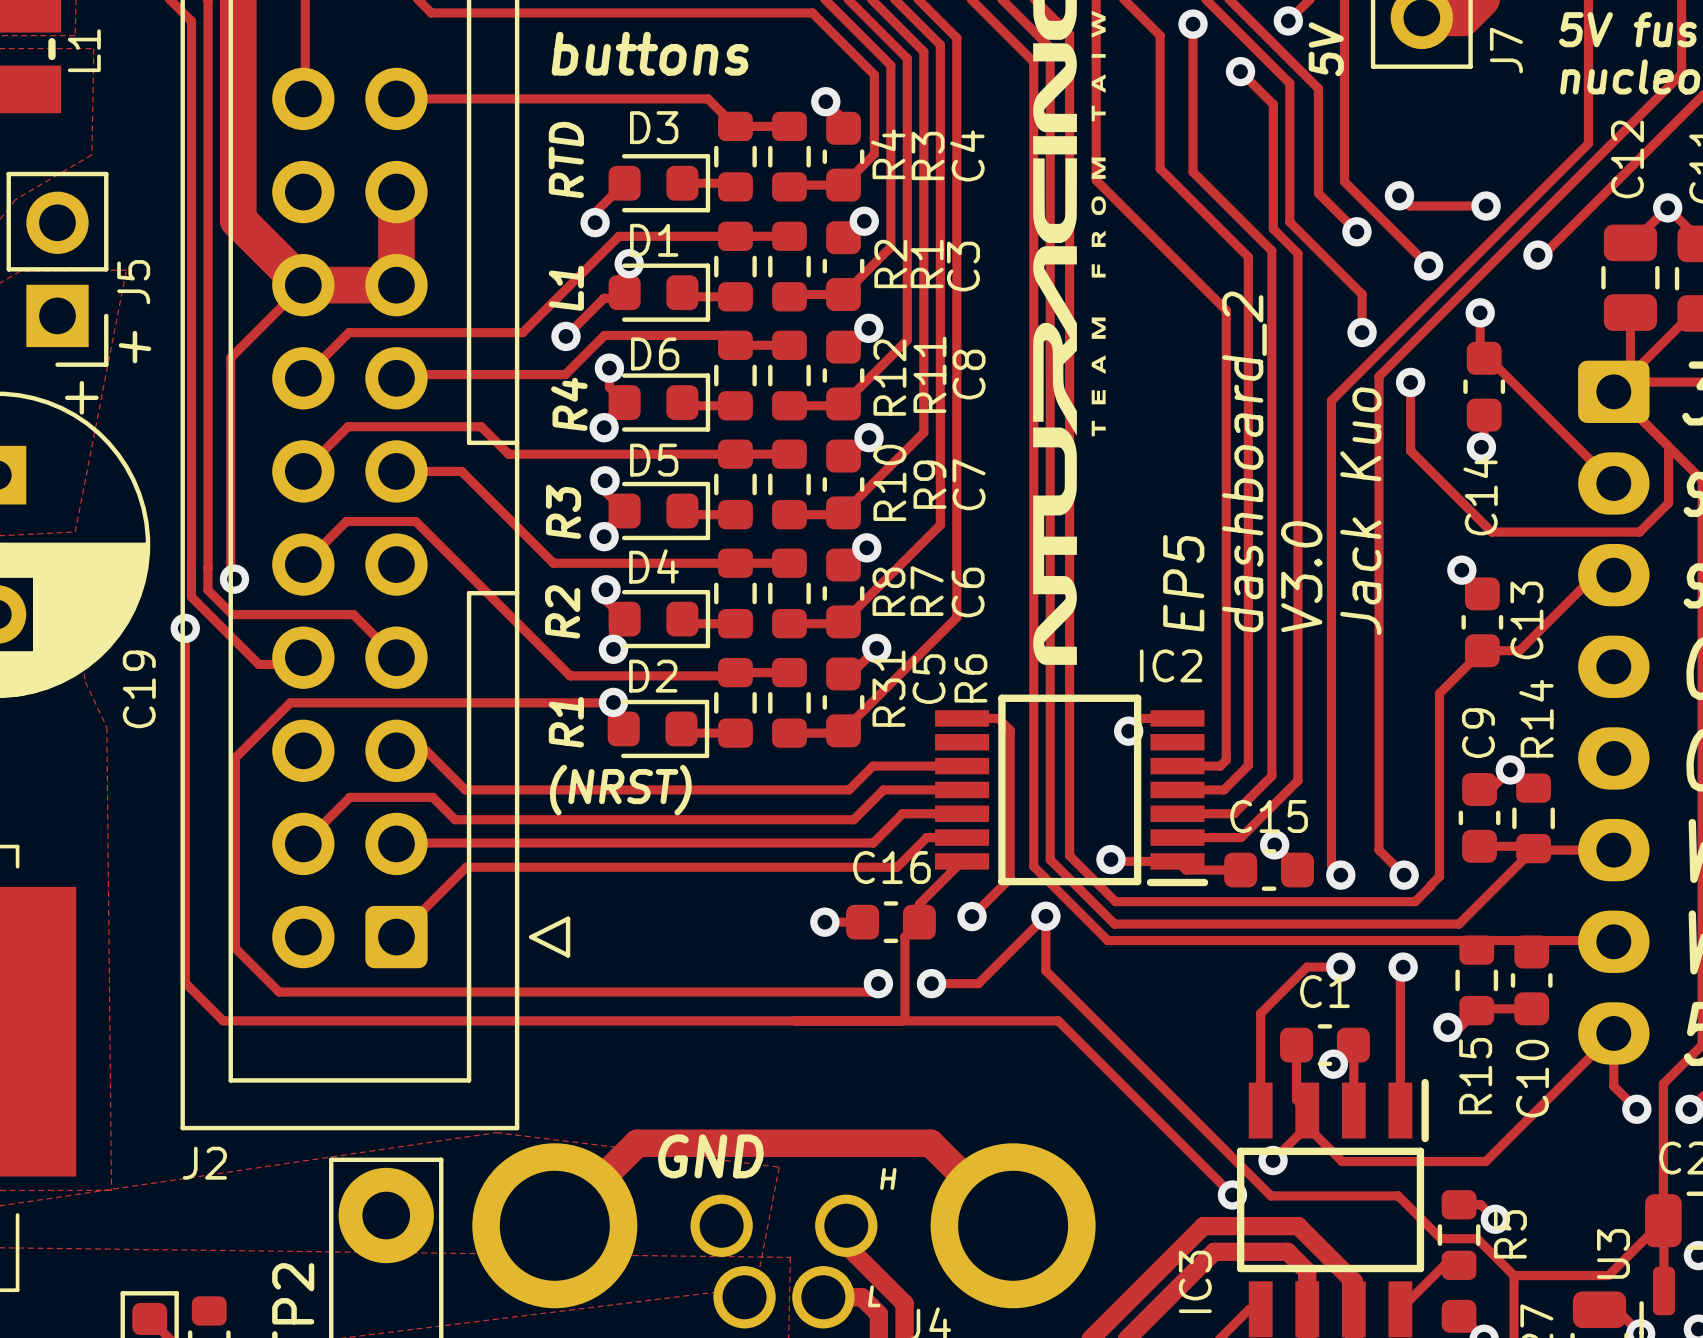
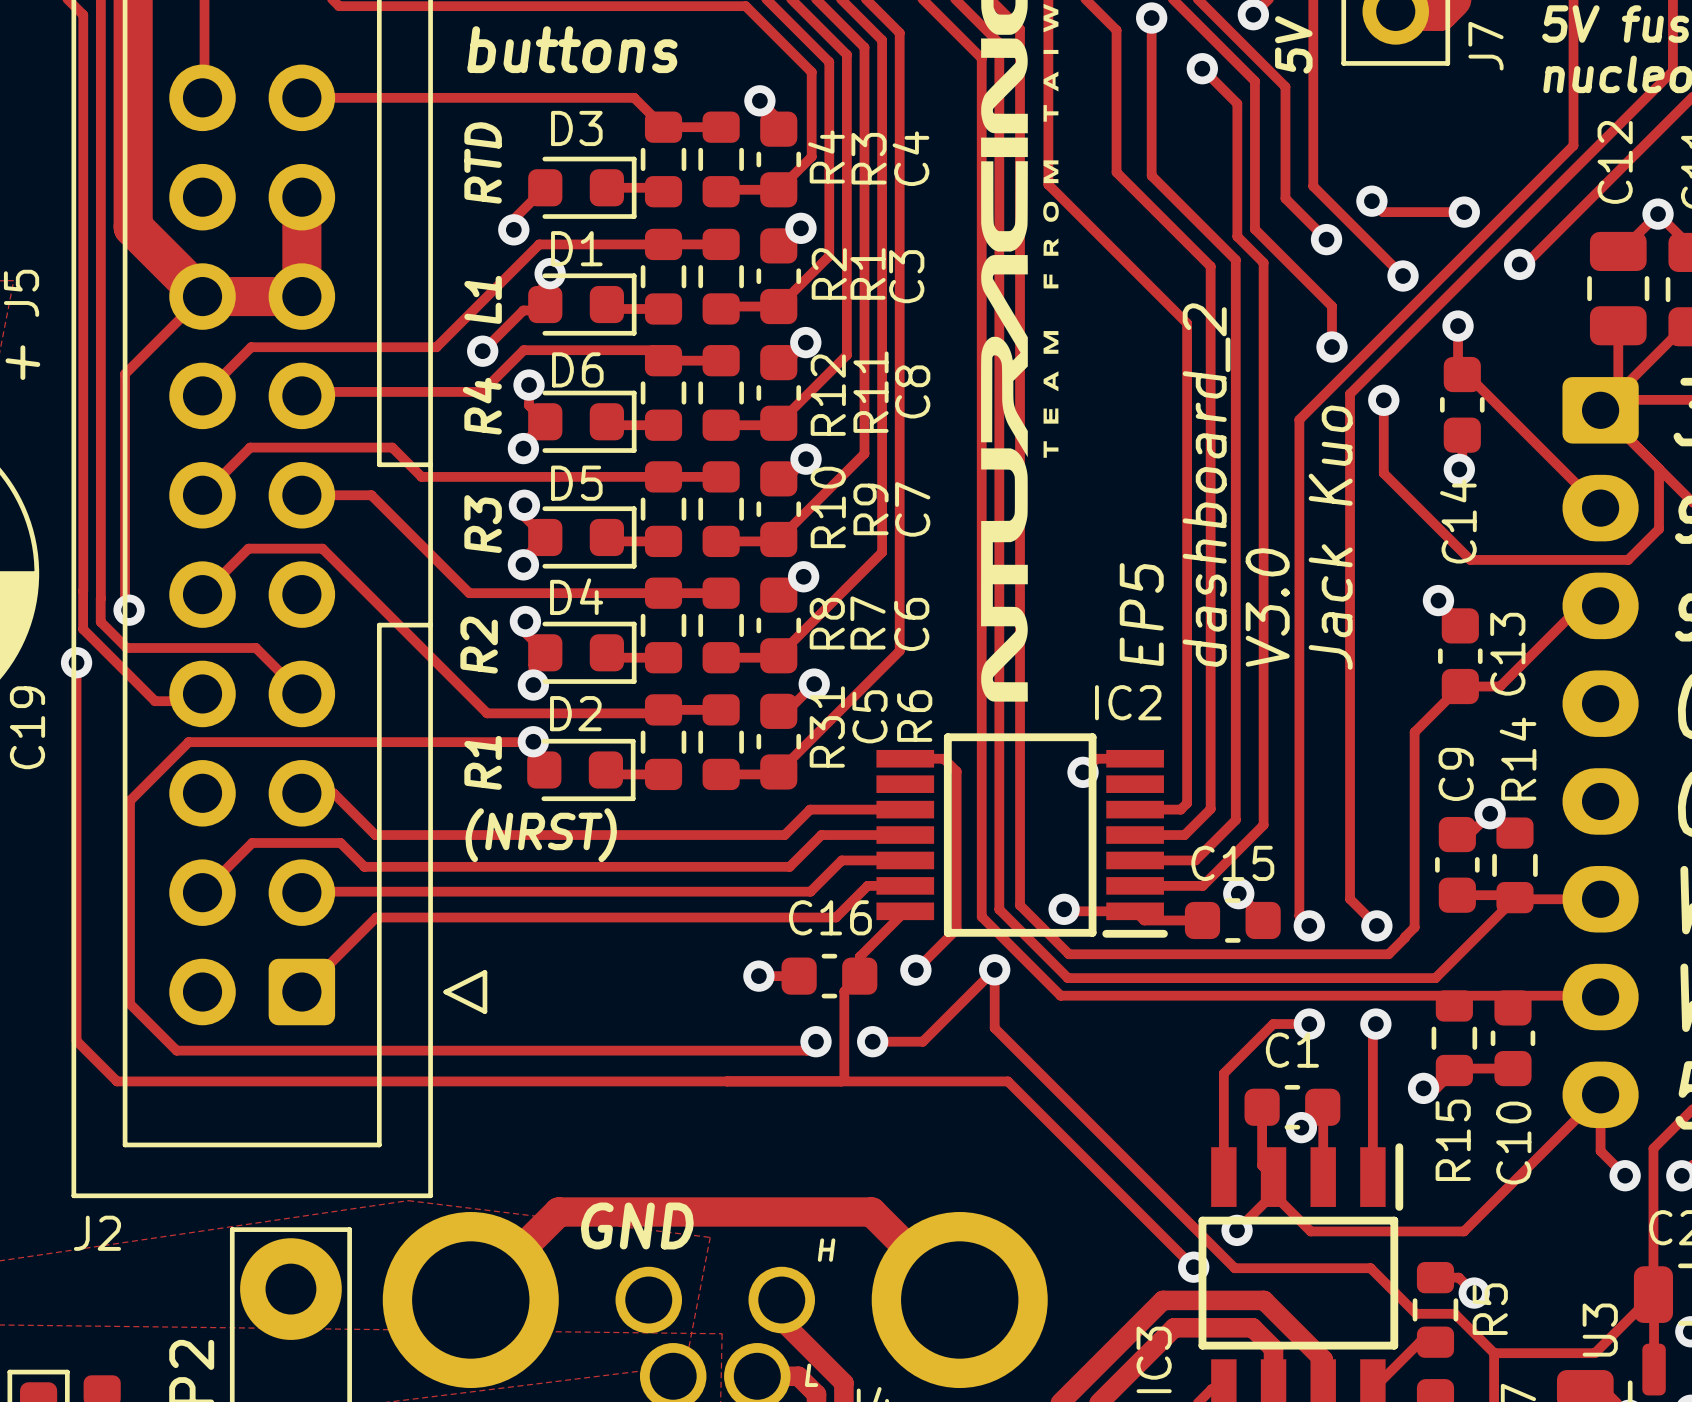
text position: R4 (569, 404) -> R4 (482, 406)
text position: R3 (563, 511) -> R3 (483, 524)

